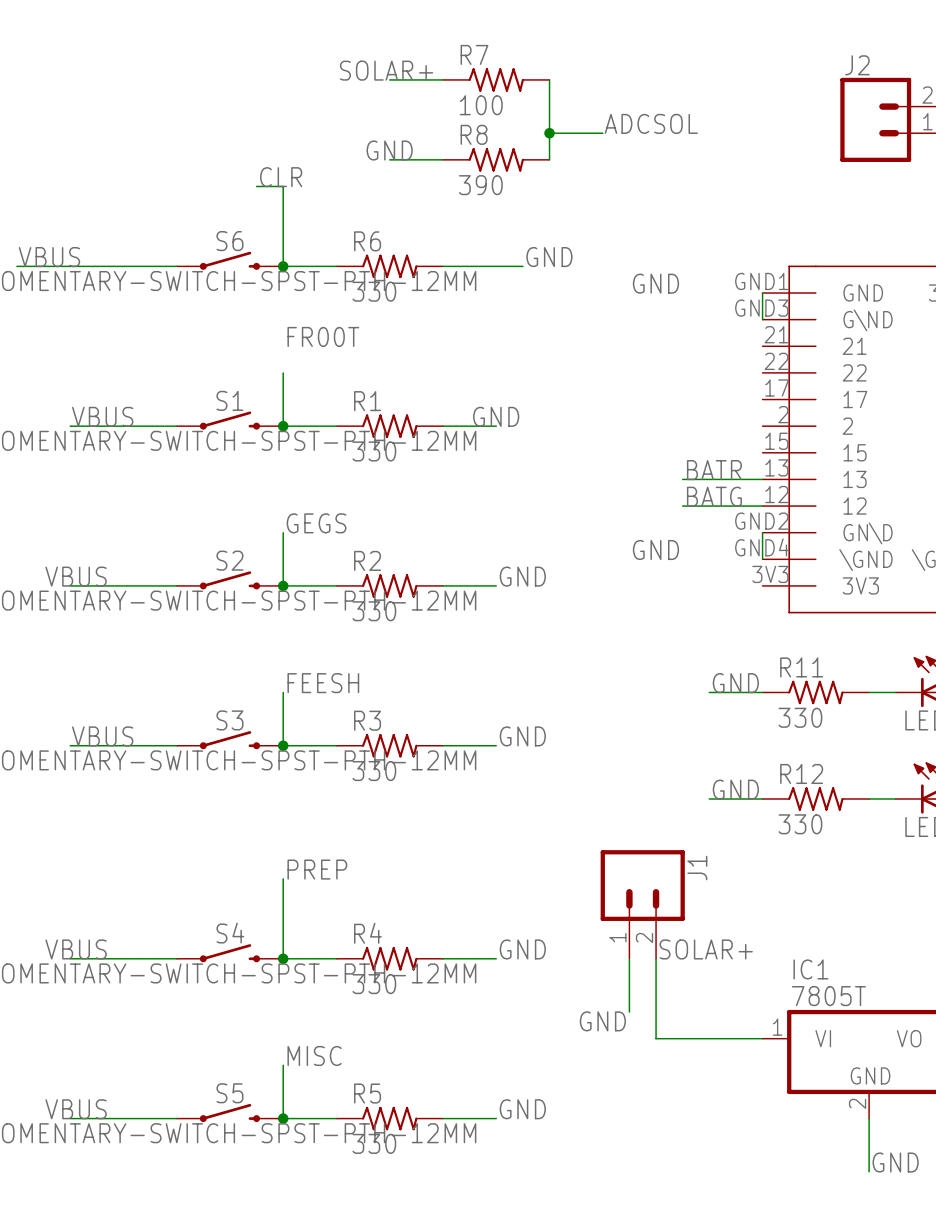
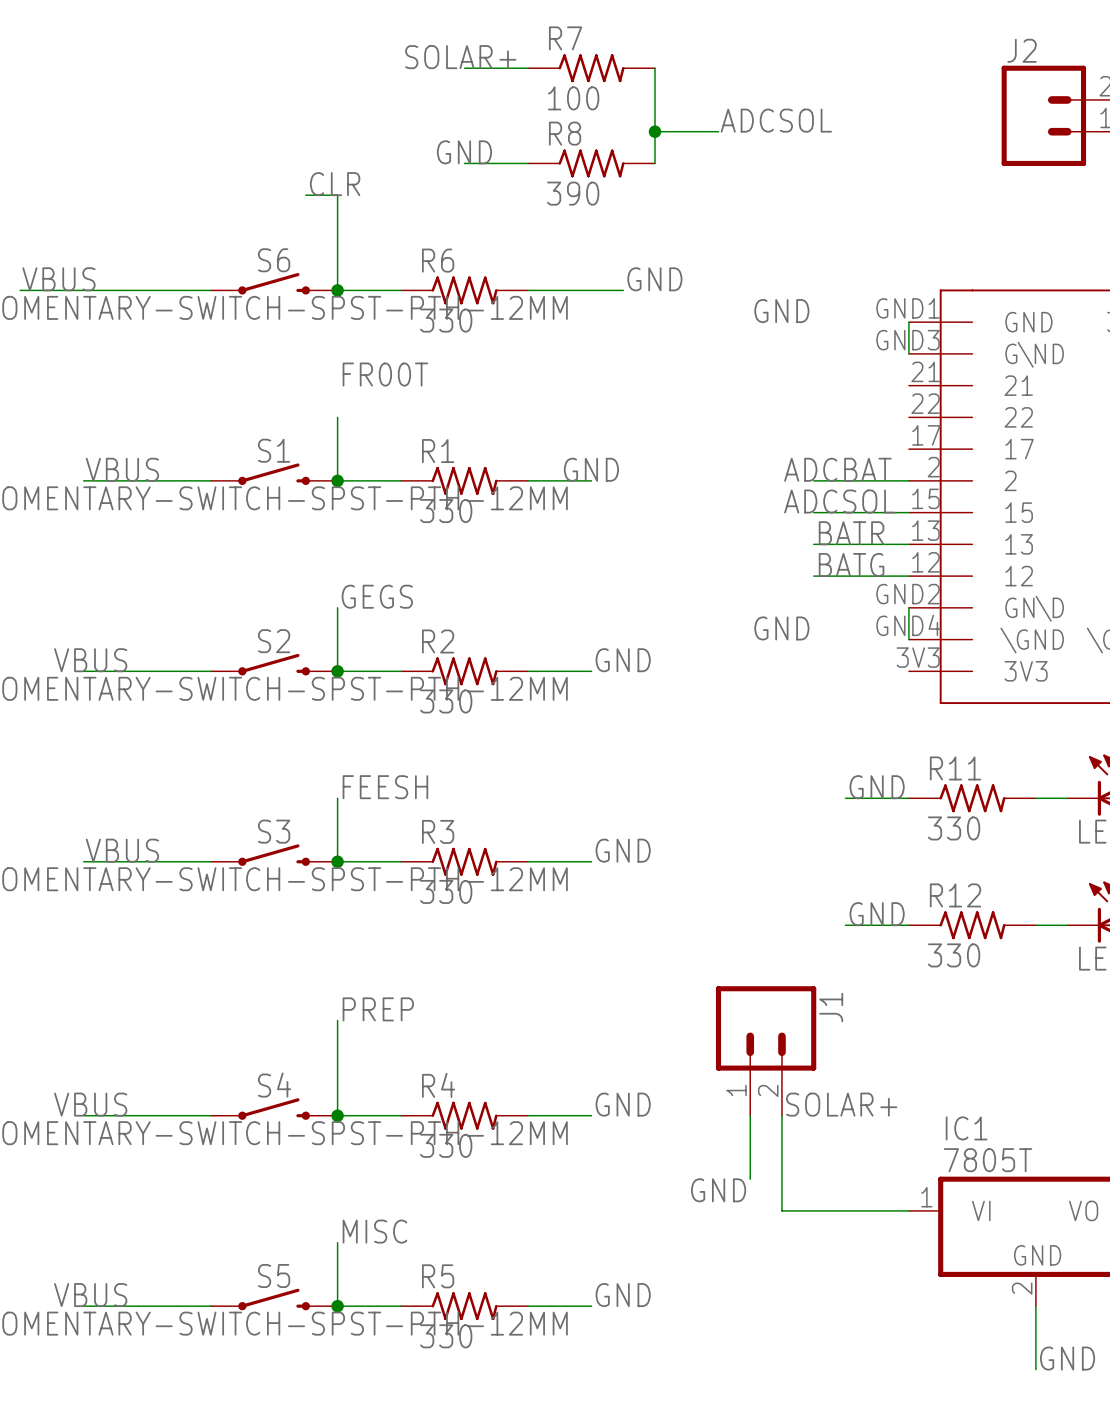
label: none -> ADCBAT (837, 469)
wire: none -> (813, 480) (908, 480)
label: none -> ADCSOL (839, 501)
wire: none -> (813, 512) (908, 512)

